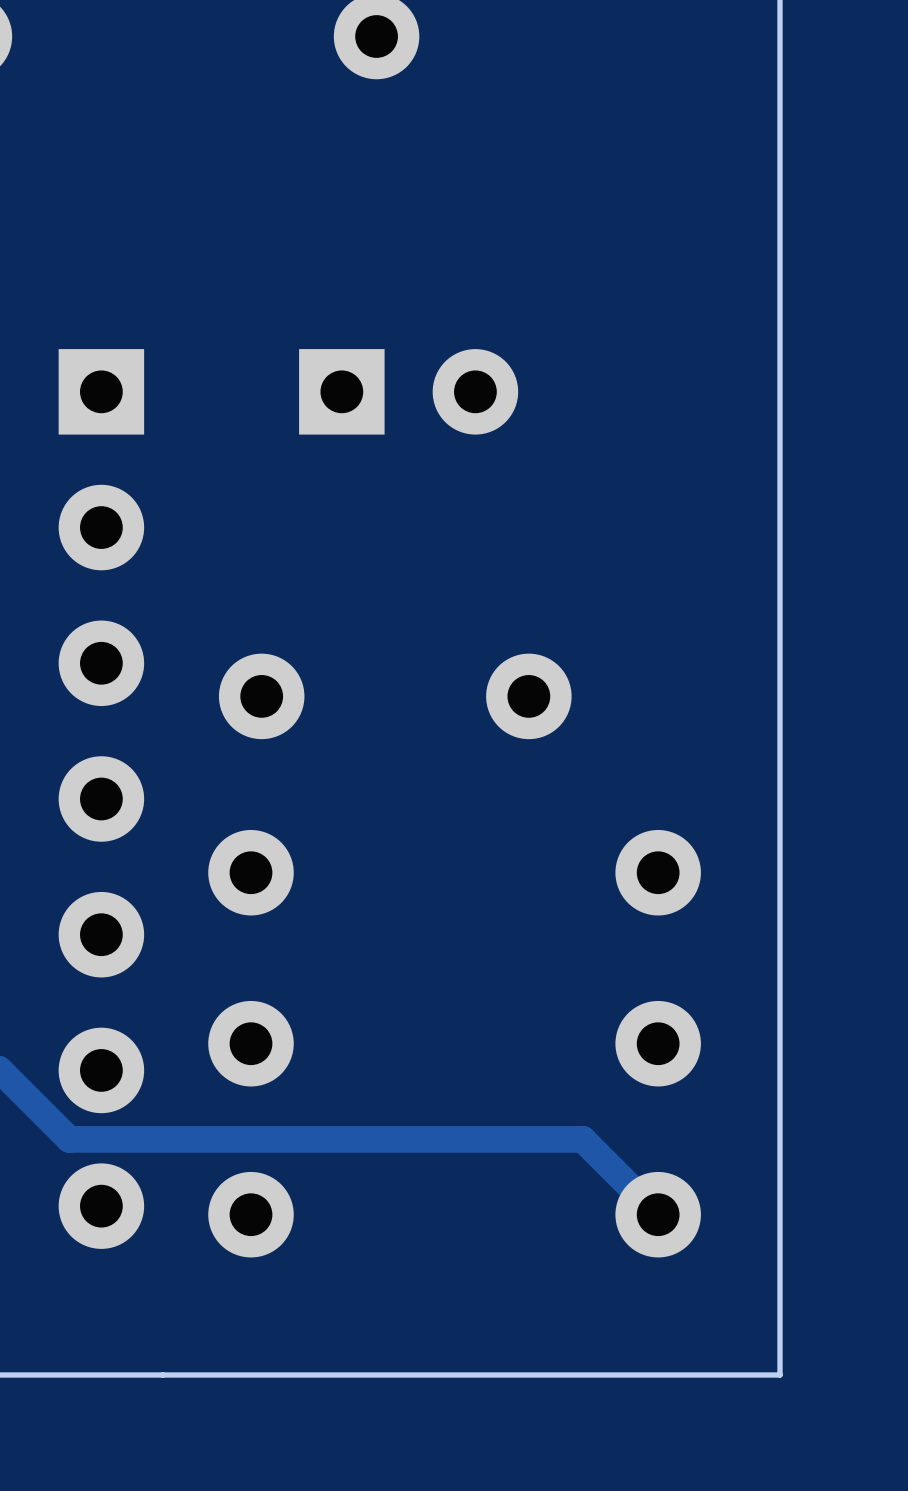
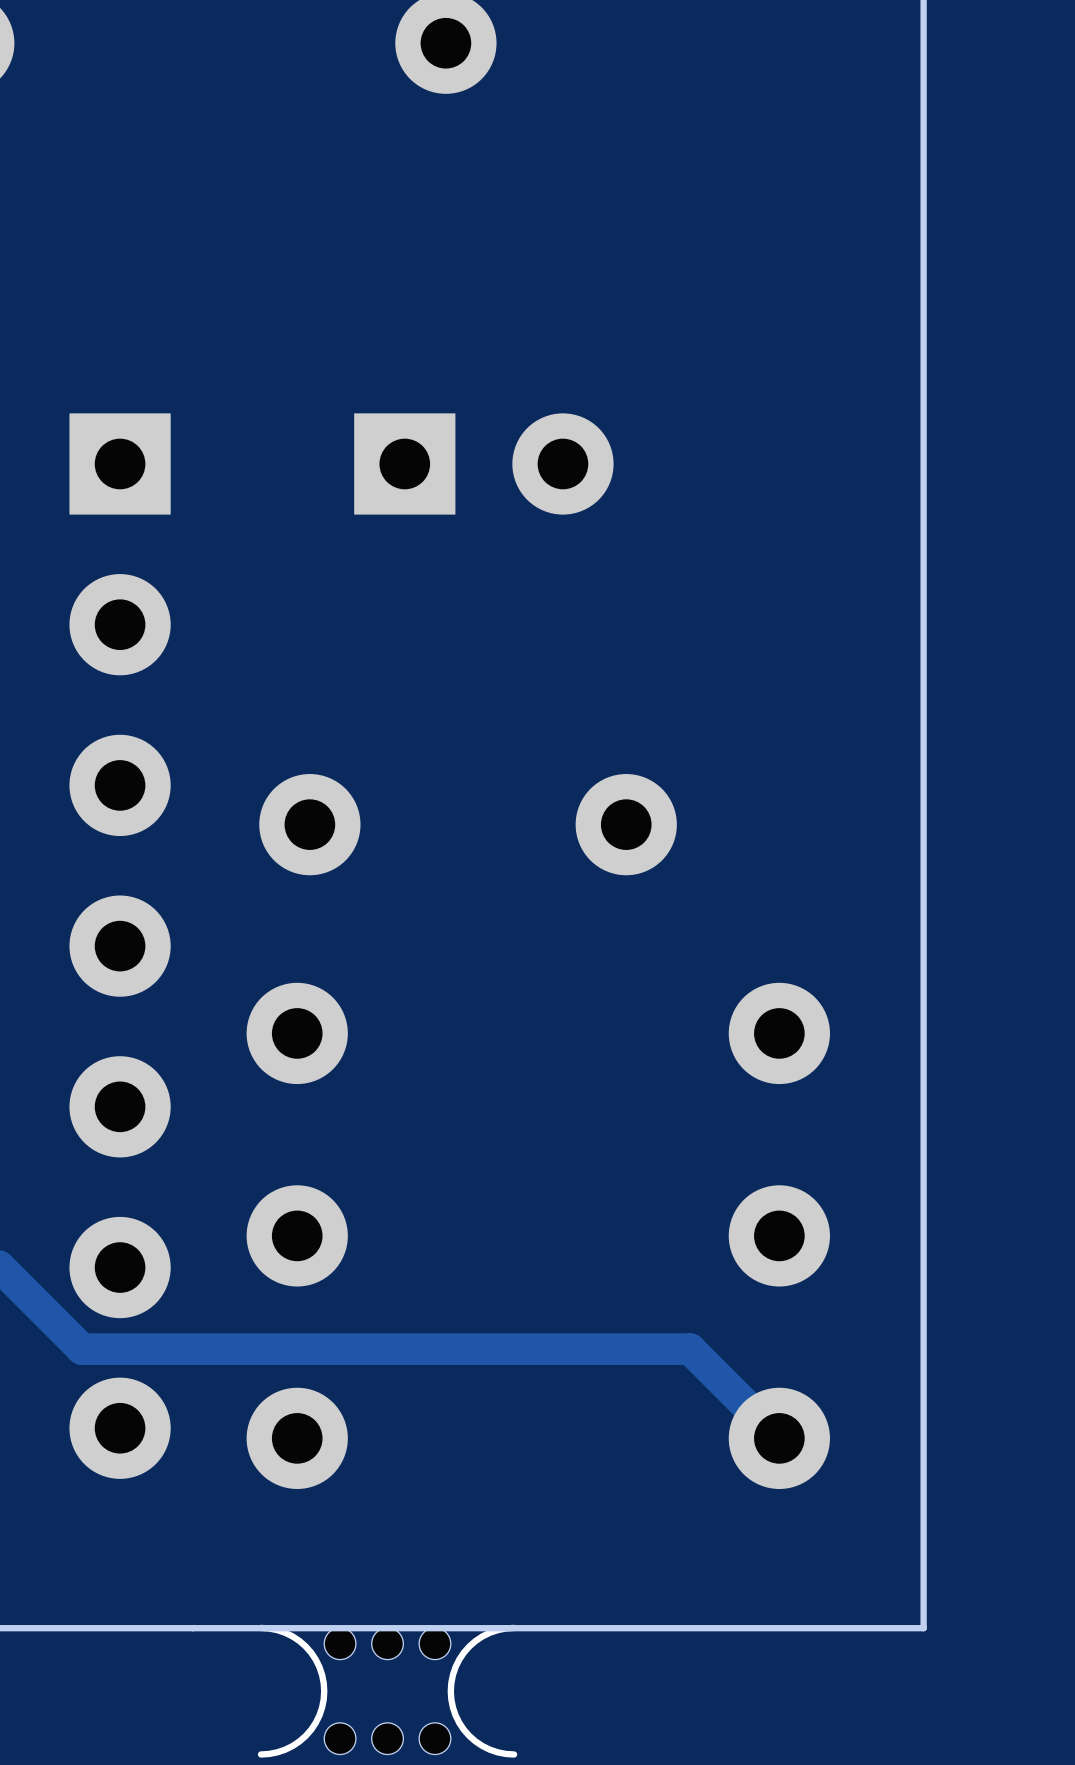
part: none -> (387, 1691)

